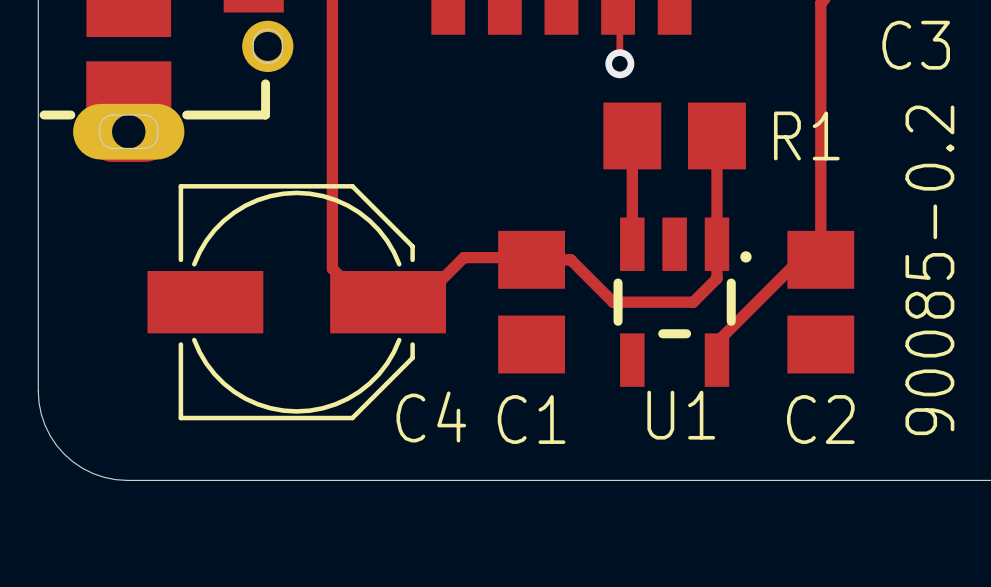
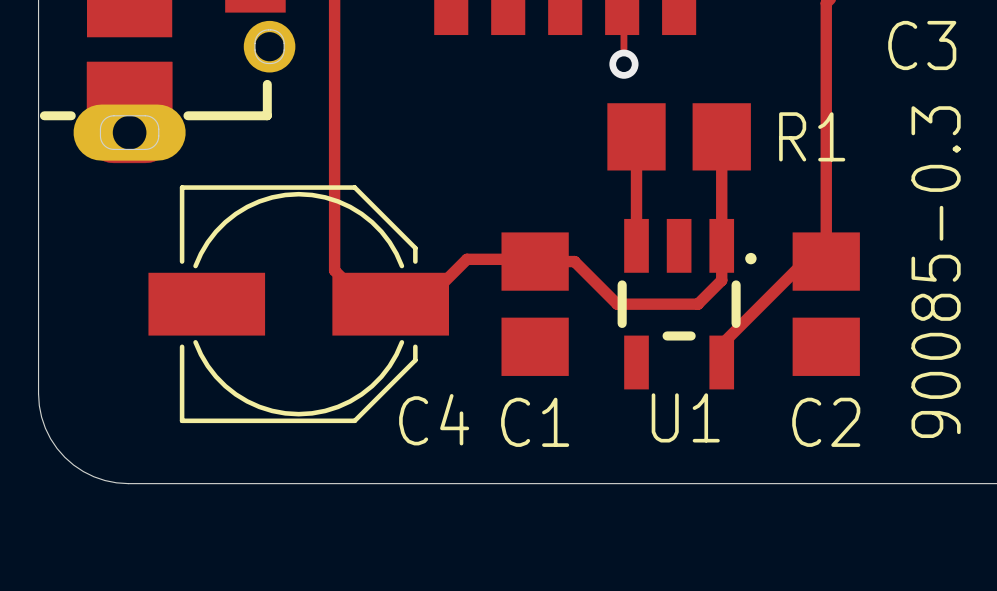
text: 90085-0.2 (929, 270) -> 90085-0.3 (936, 272)

